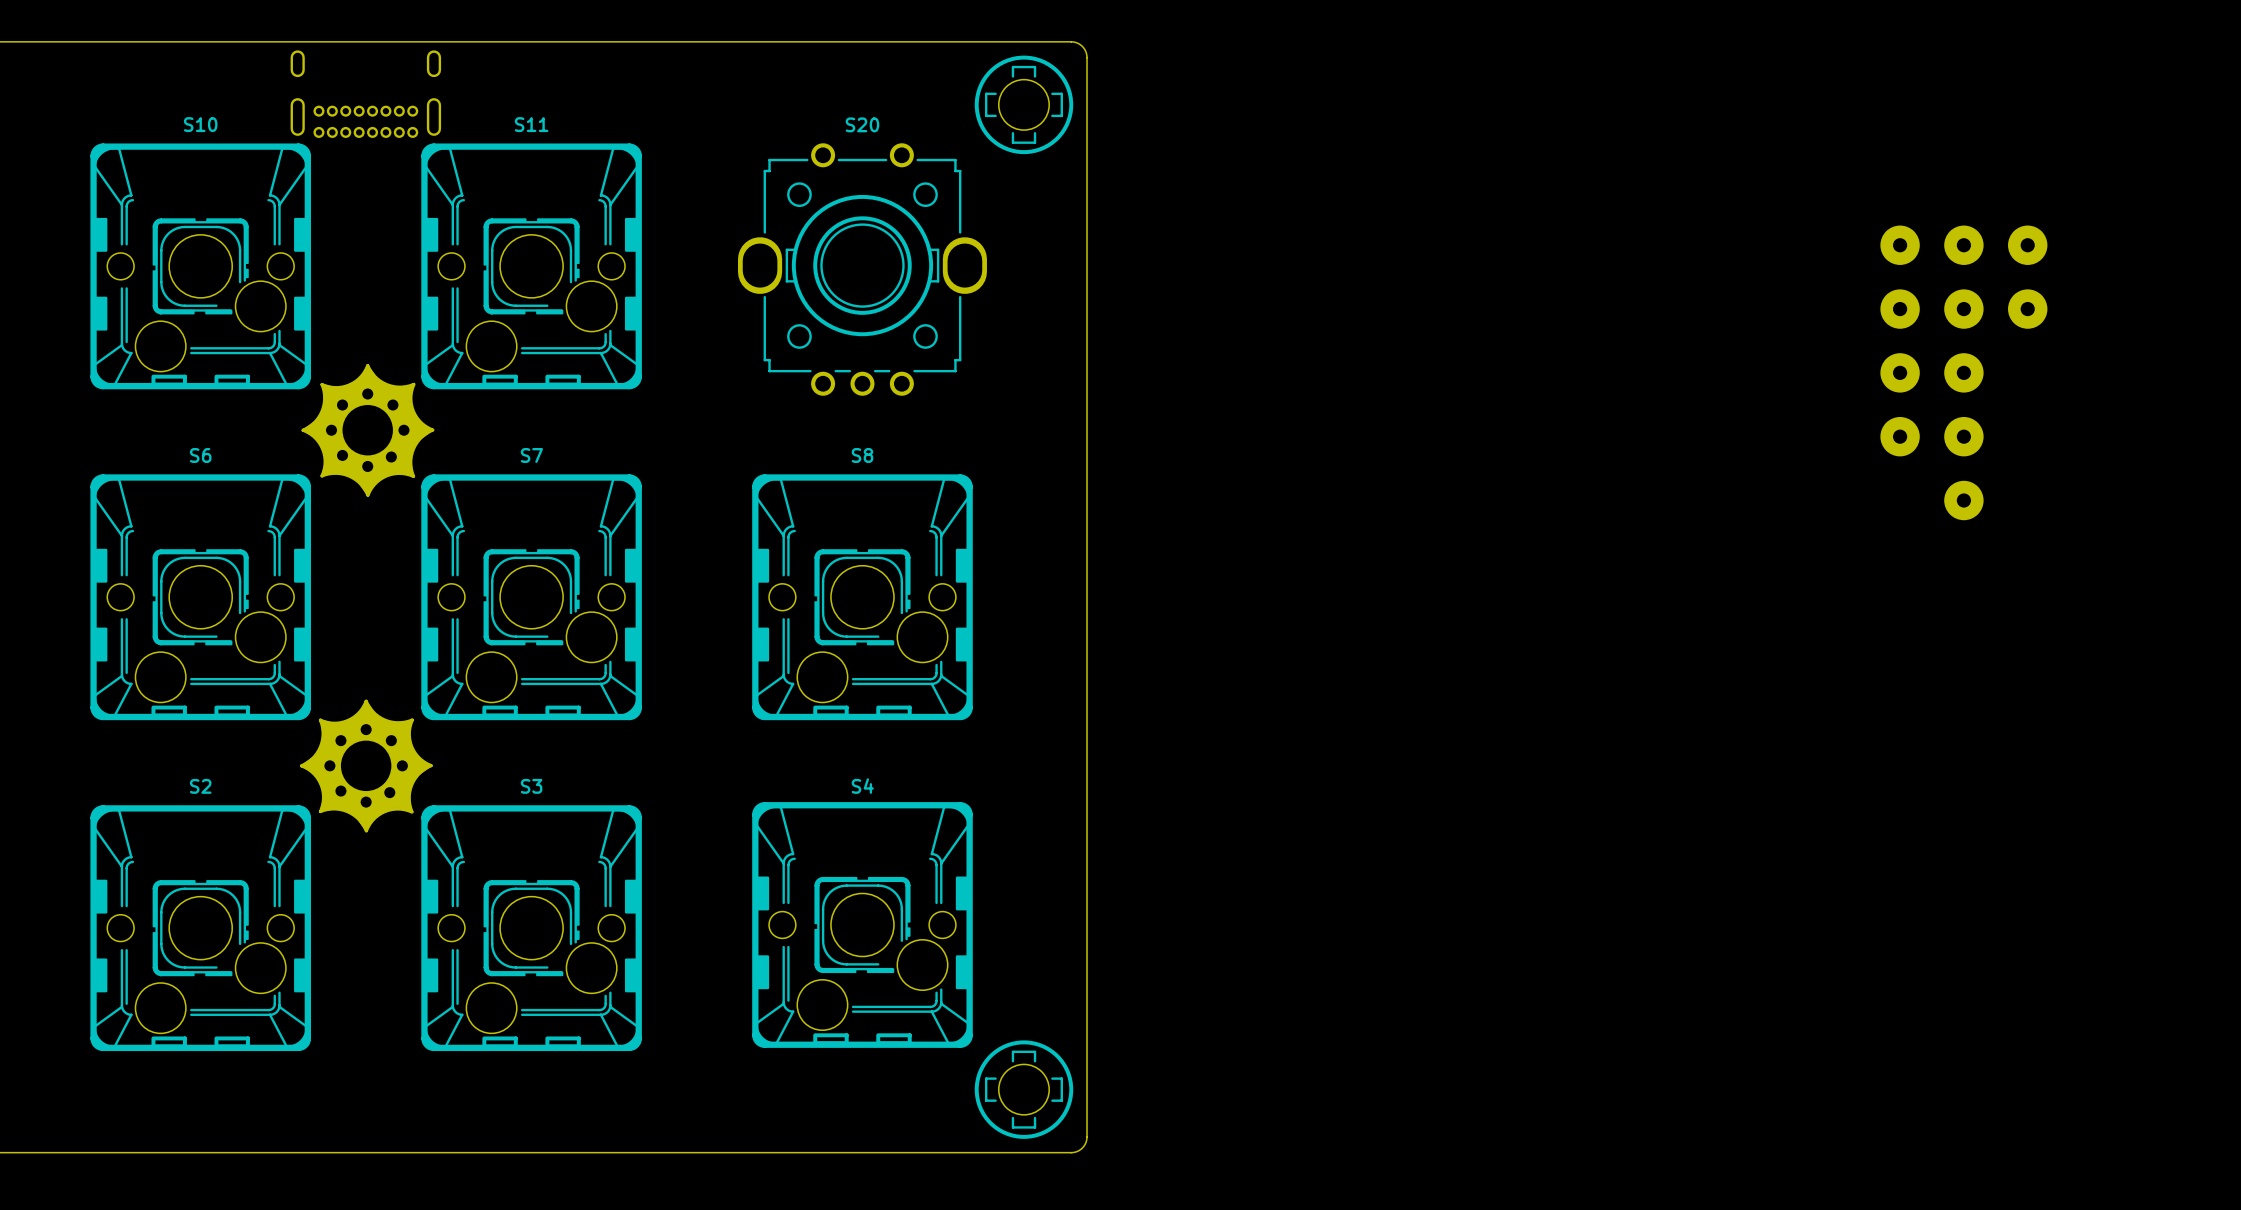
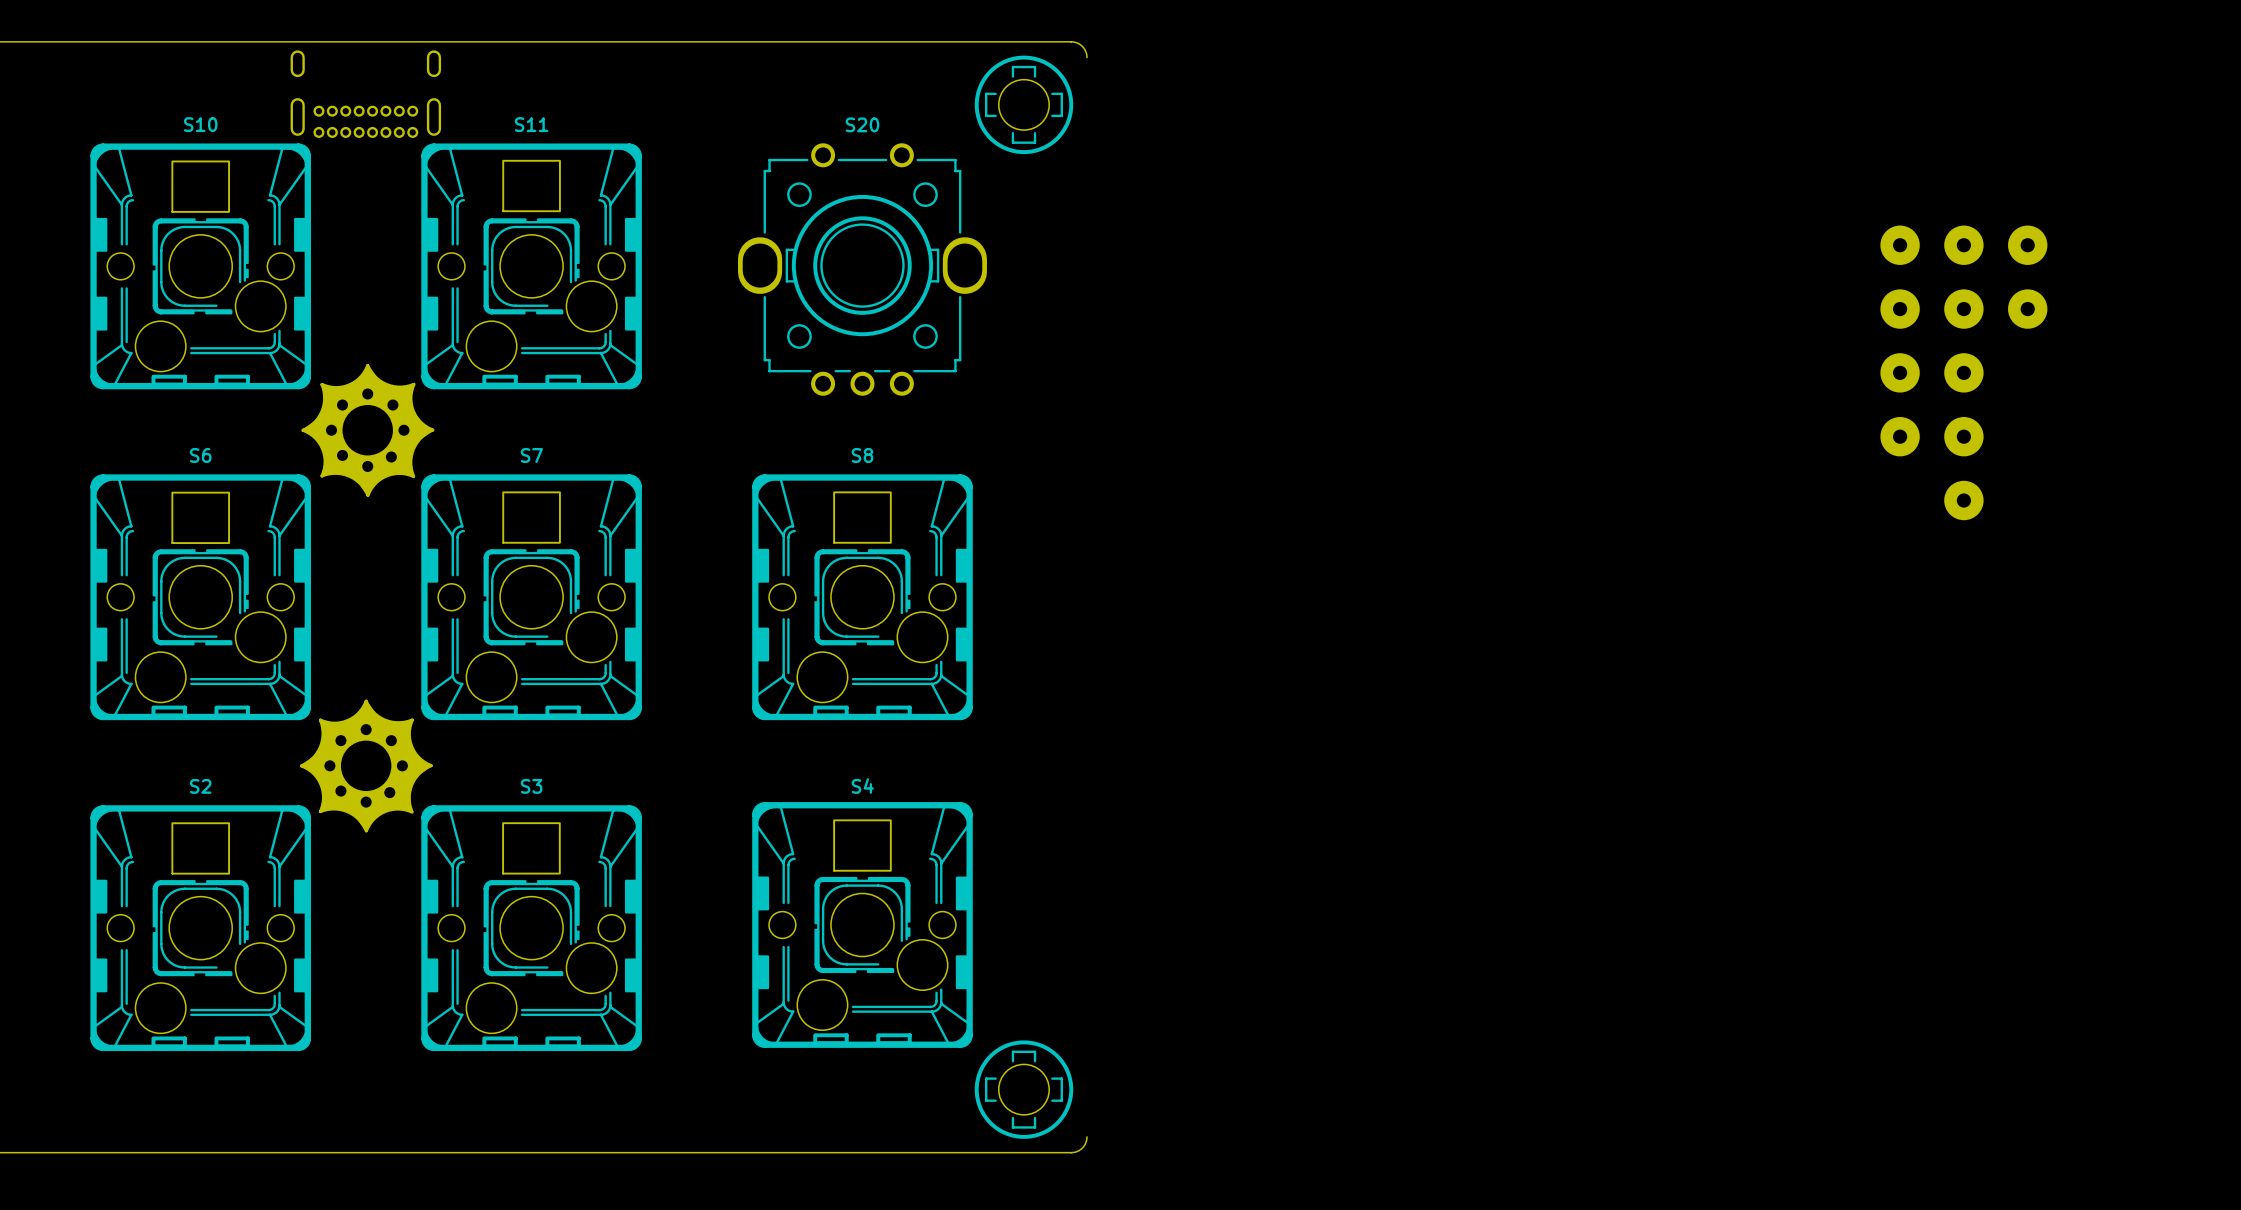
board edge: (1087, 57) (1087, 1136) -> none
part: none -> (200, 186)
part: none -> (531, 186)
part: none -> (200, 517)
part: none -> (531, 517)
part: none -> (862, 517)
part: none -> (862, 845)
part: none -> (200, 848)
part: none -> (531, 848)

